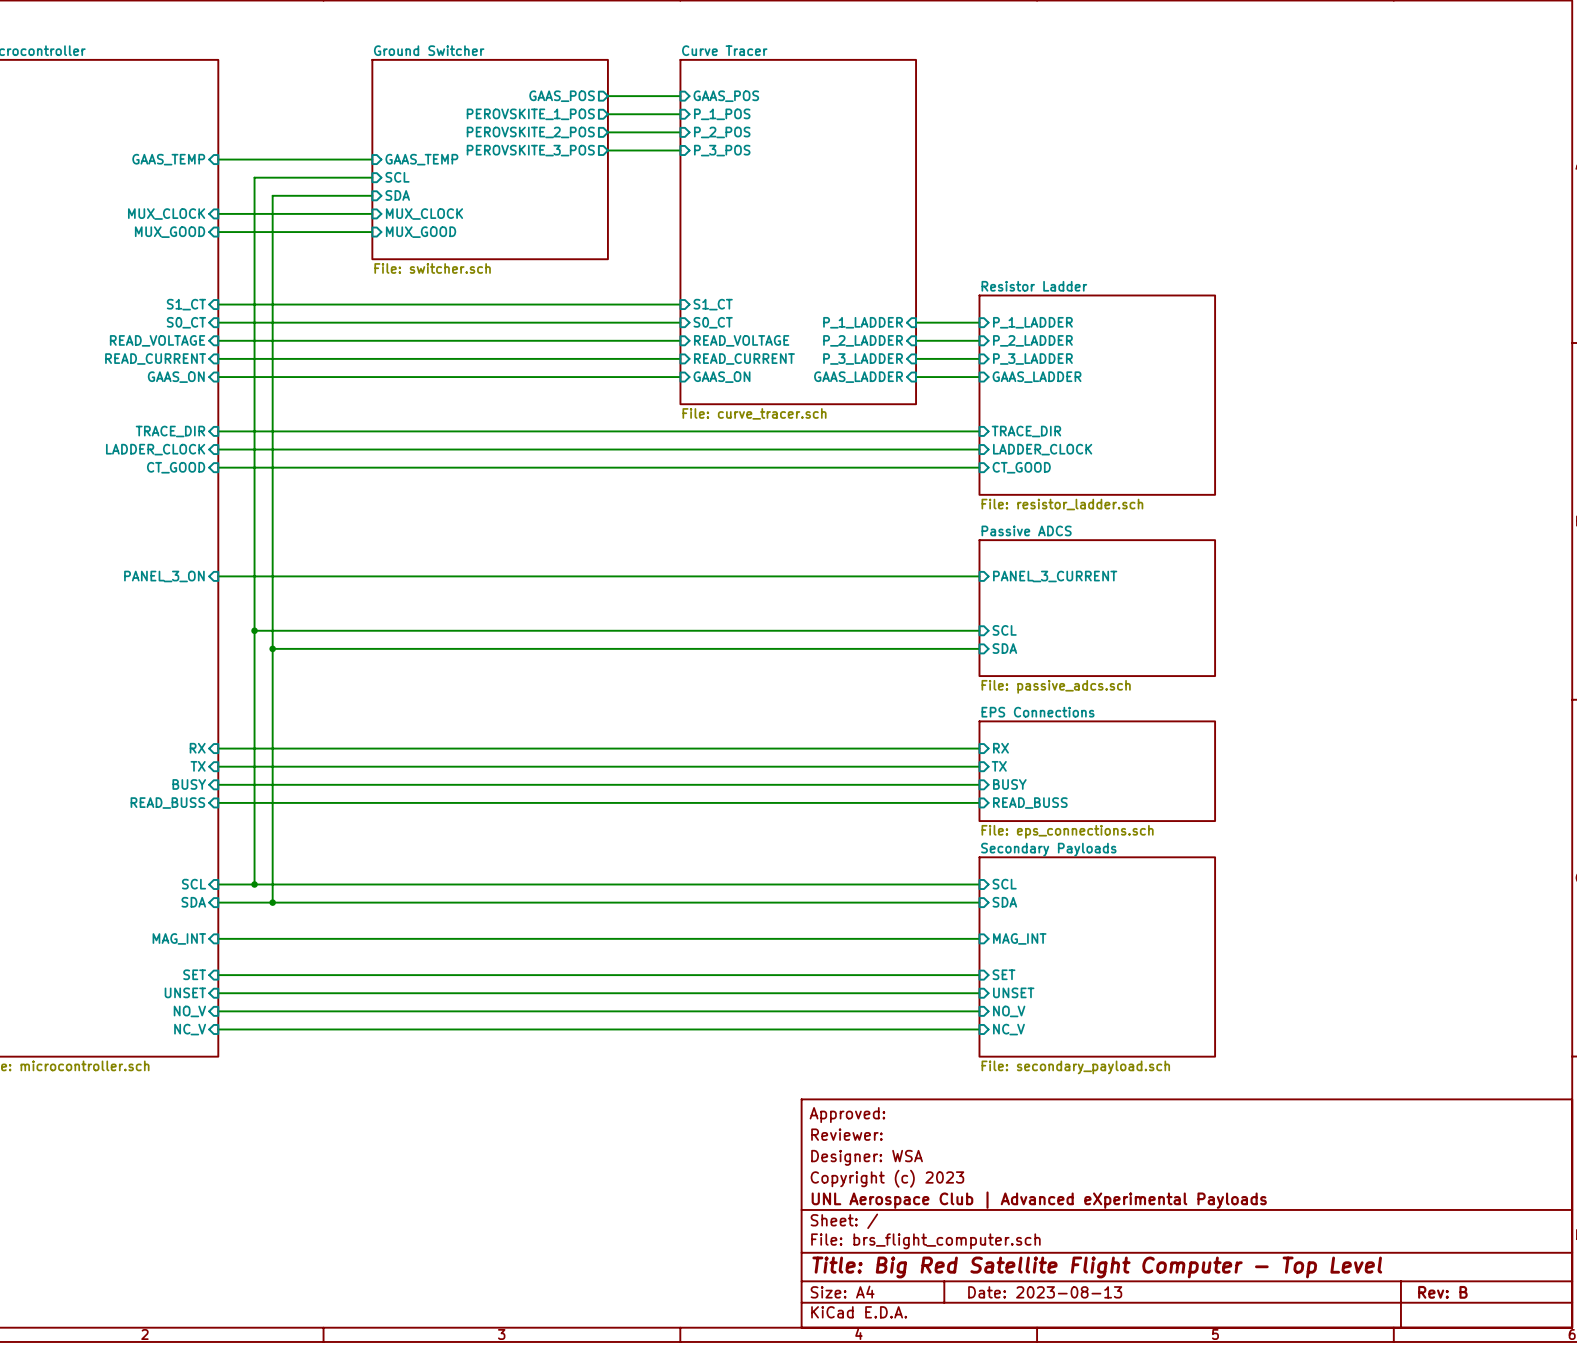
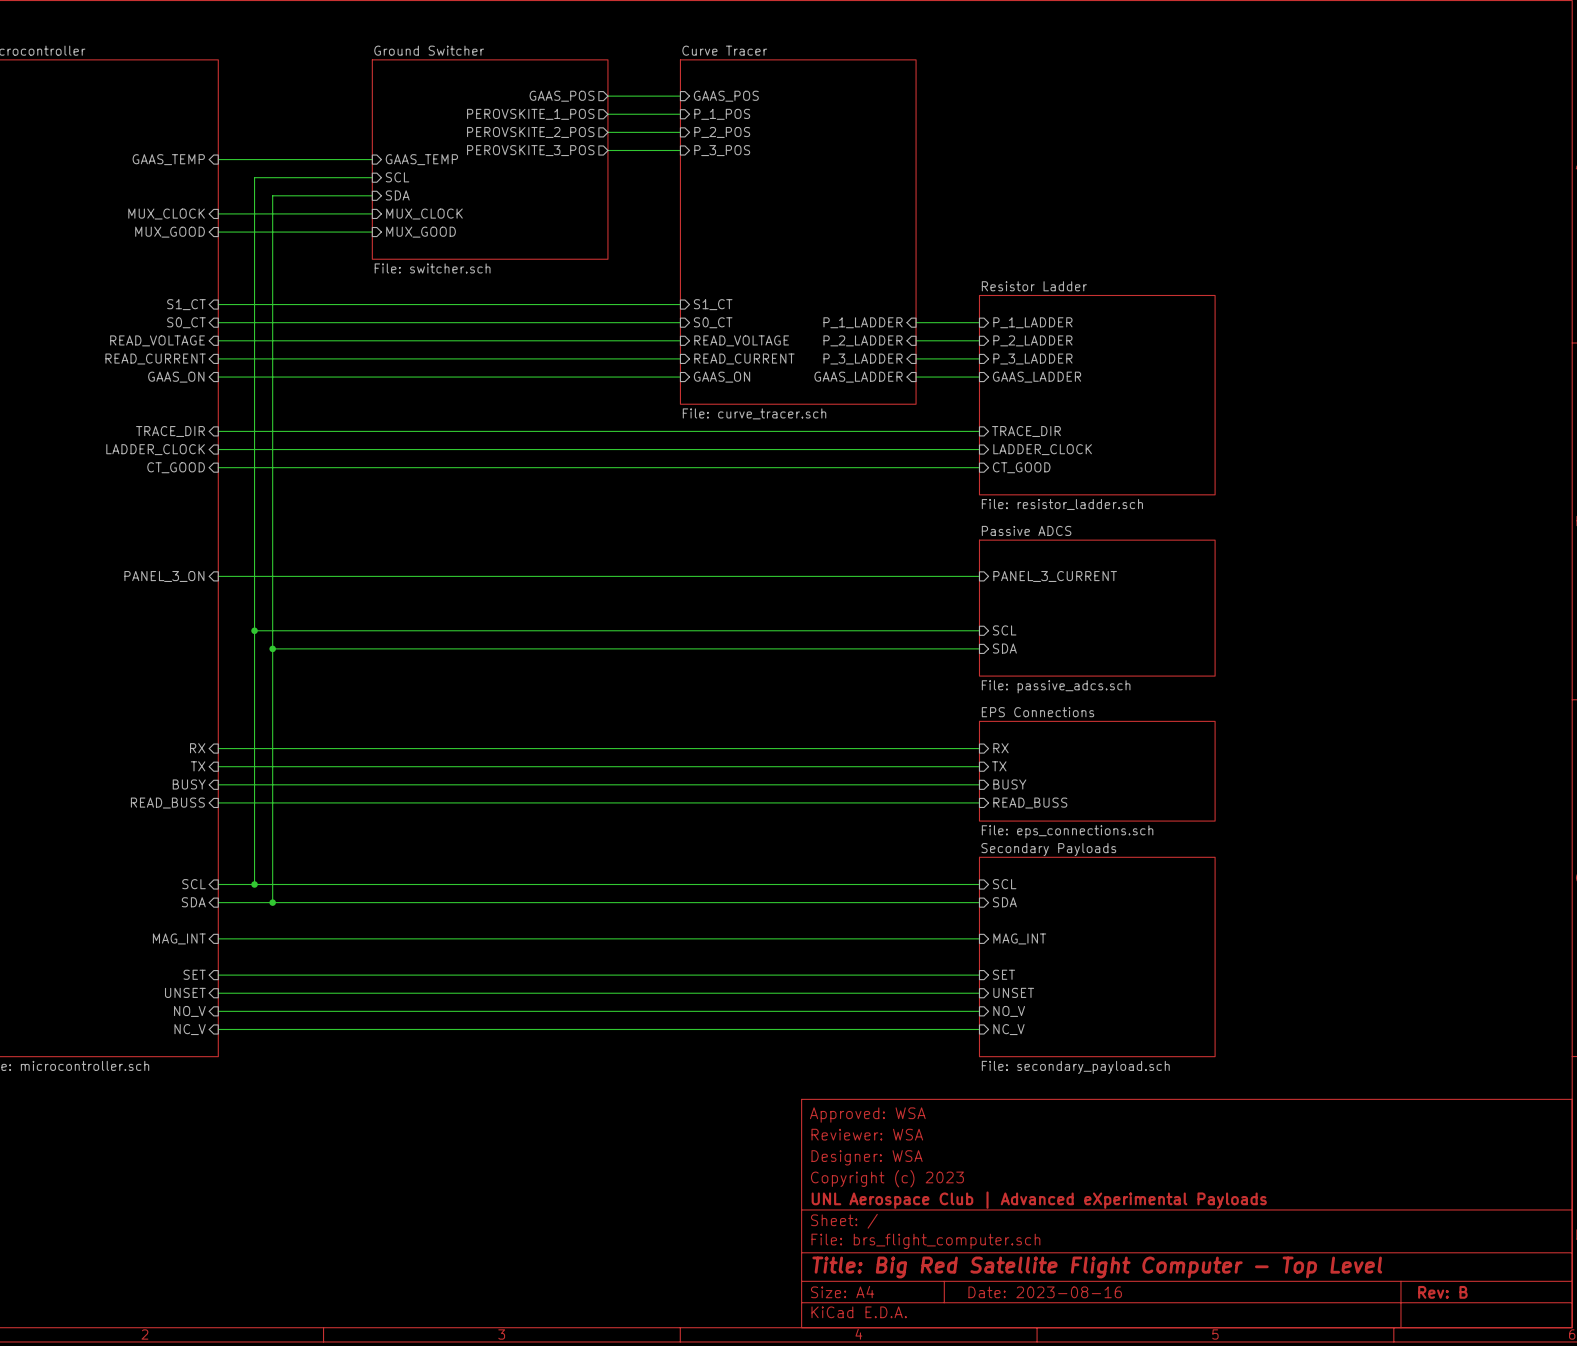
title block: Approved: (847, 1115) -> Approved: WSA (867, 1115)
title block: Reviewer: (846, 1134) -> Reviewer: WSA (867, 1134)
title block: Date: 2023-08-13 (1045, 1292) -> Date: 2023-08-16 (1045, 1292)

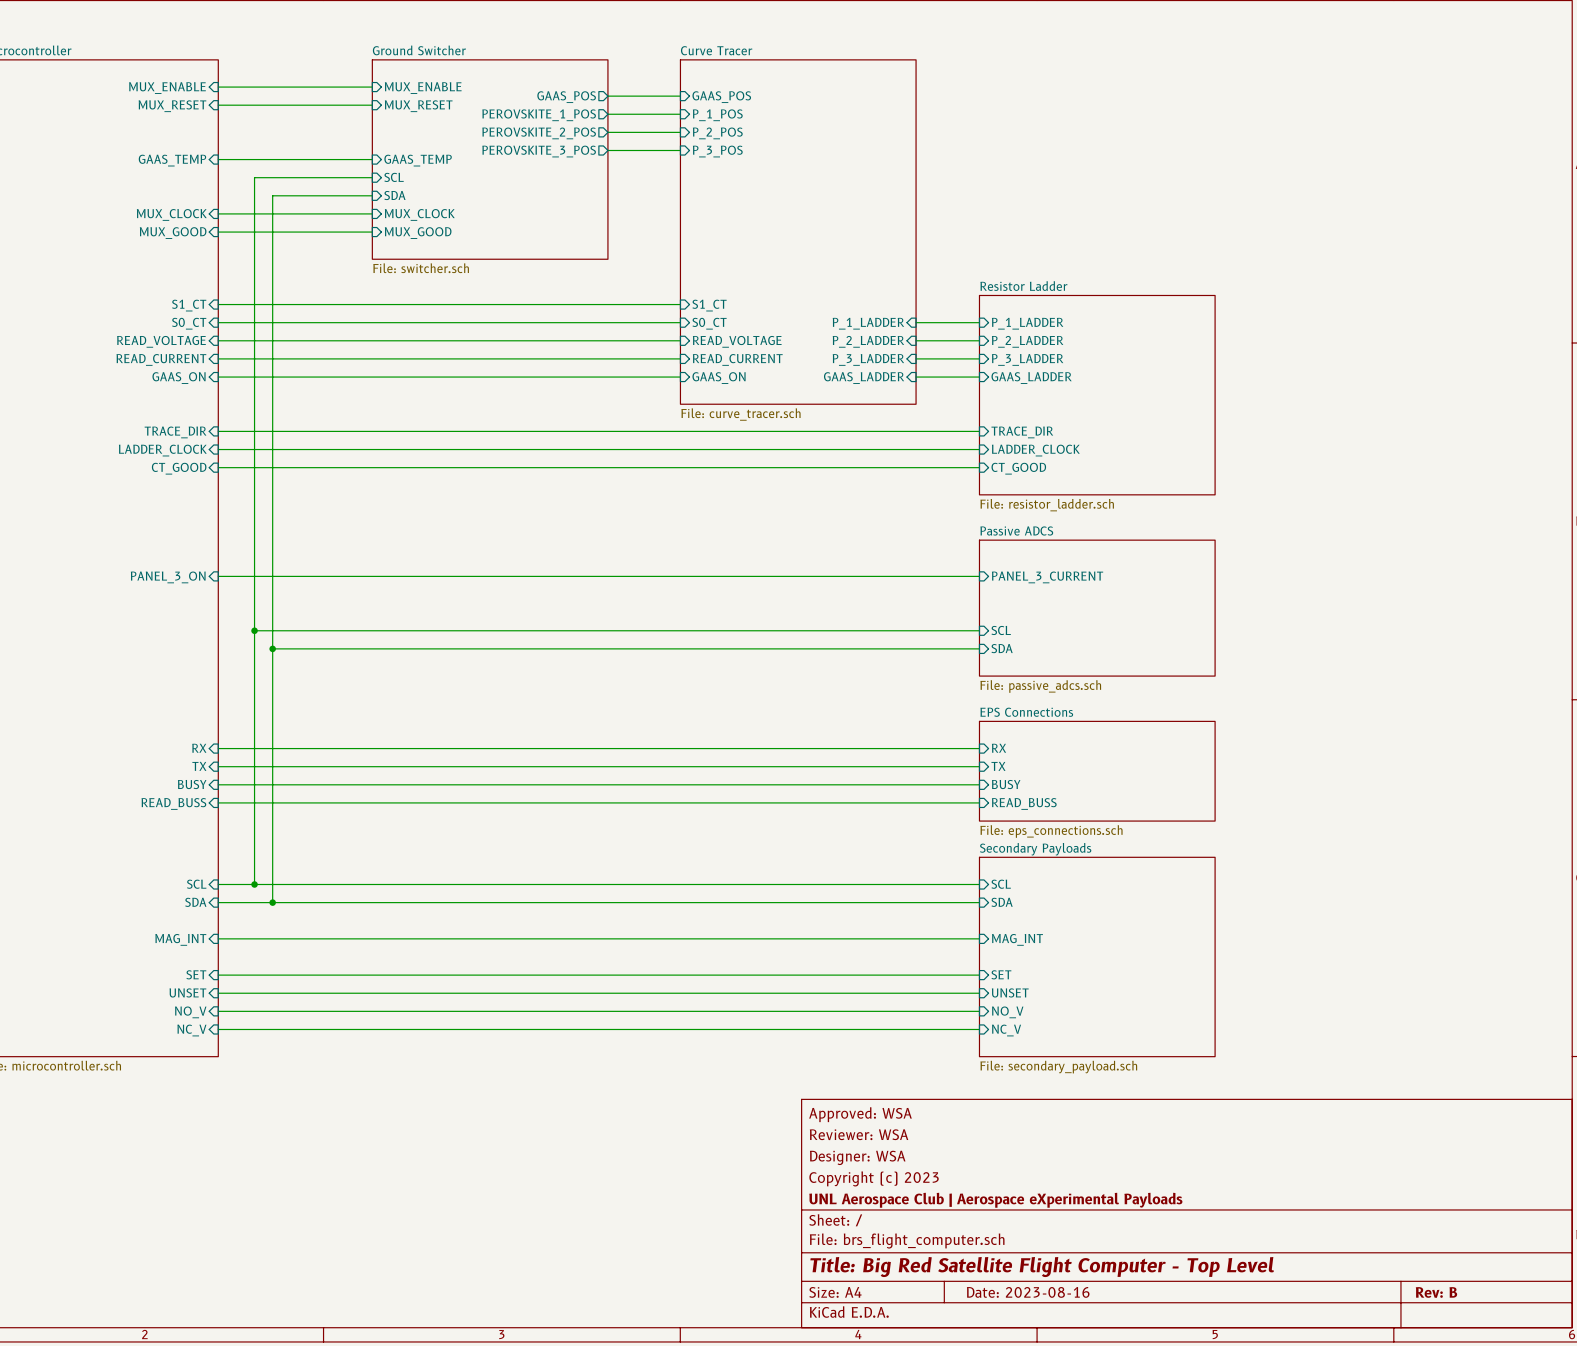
sheet pin: none -> MUX_ENABLE (167, 88)
wire: none -> (218, 87) (372, 87)
sheet pin: none -> MUX_ENABLE (423, 88)
sheet pin: none -> MUX_RESET (172, 106)
wire: none -> (218, 105) (372, 105)
sheet pin: none -> MUX_RESET (418, 106)
title block: UNL Aerospace Club | Advanced eXperimental Payloads (1039, 1200) -> UNL Aerospace Club | Aerospace eXperimental Payloads (995, 1200)

